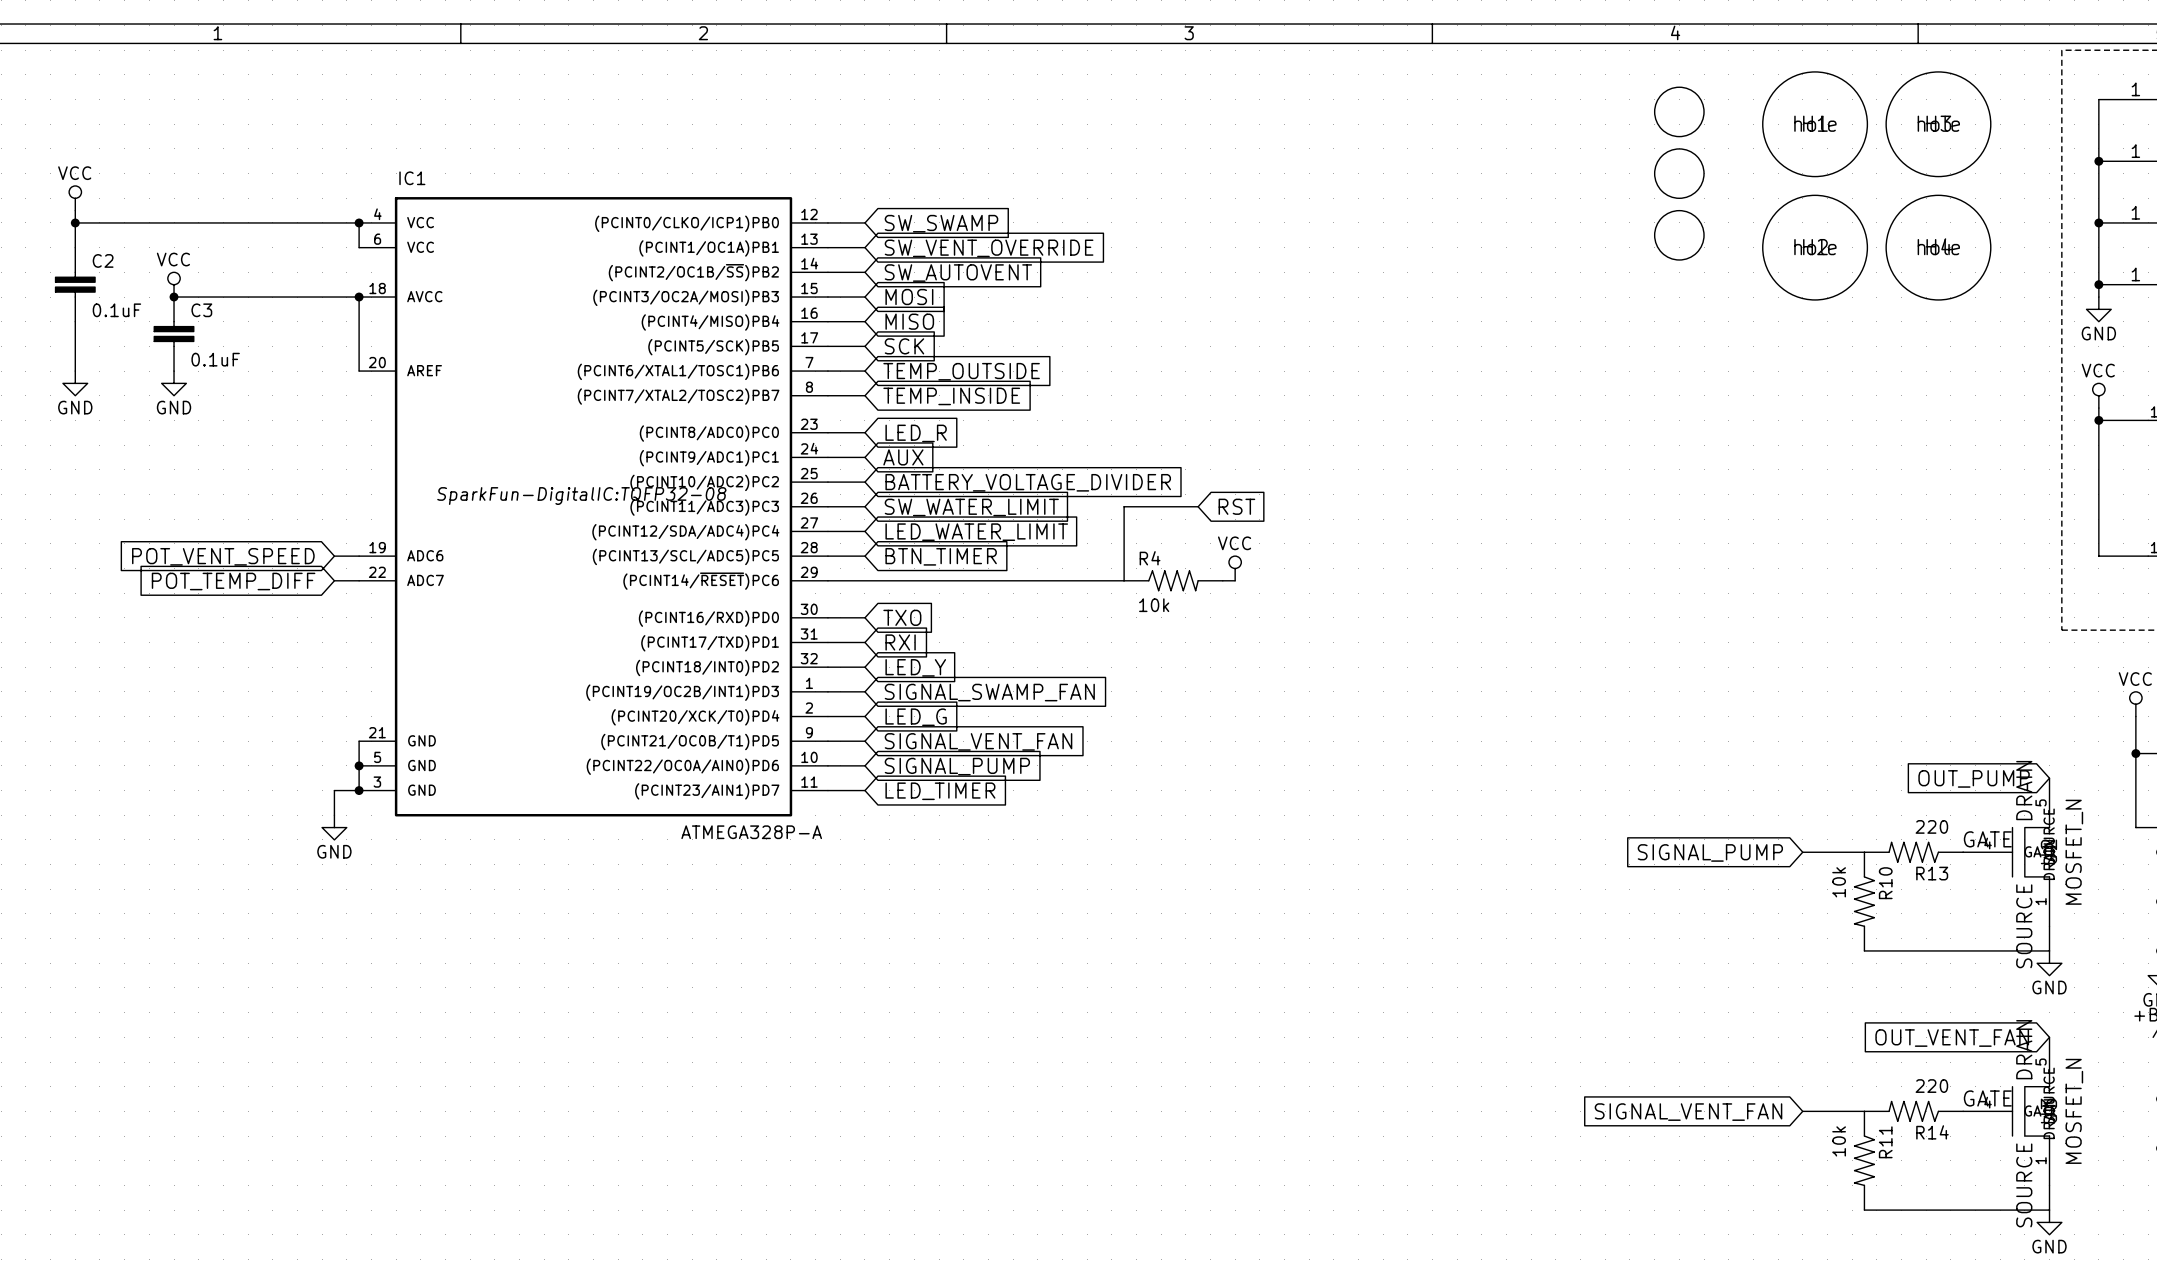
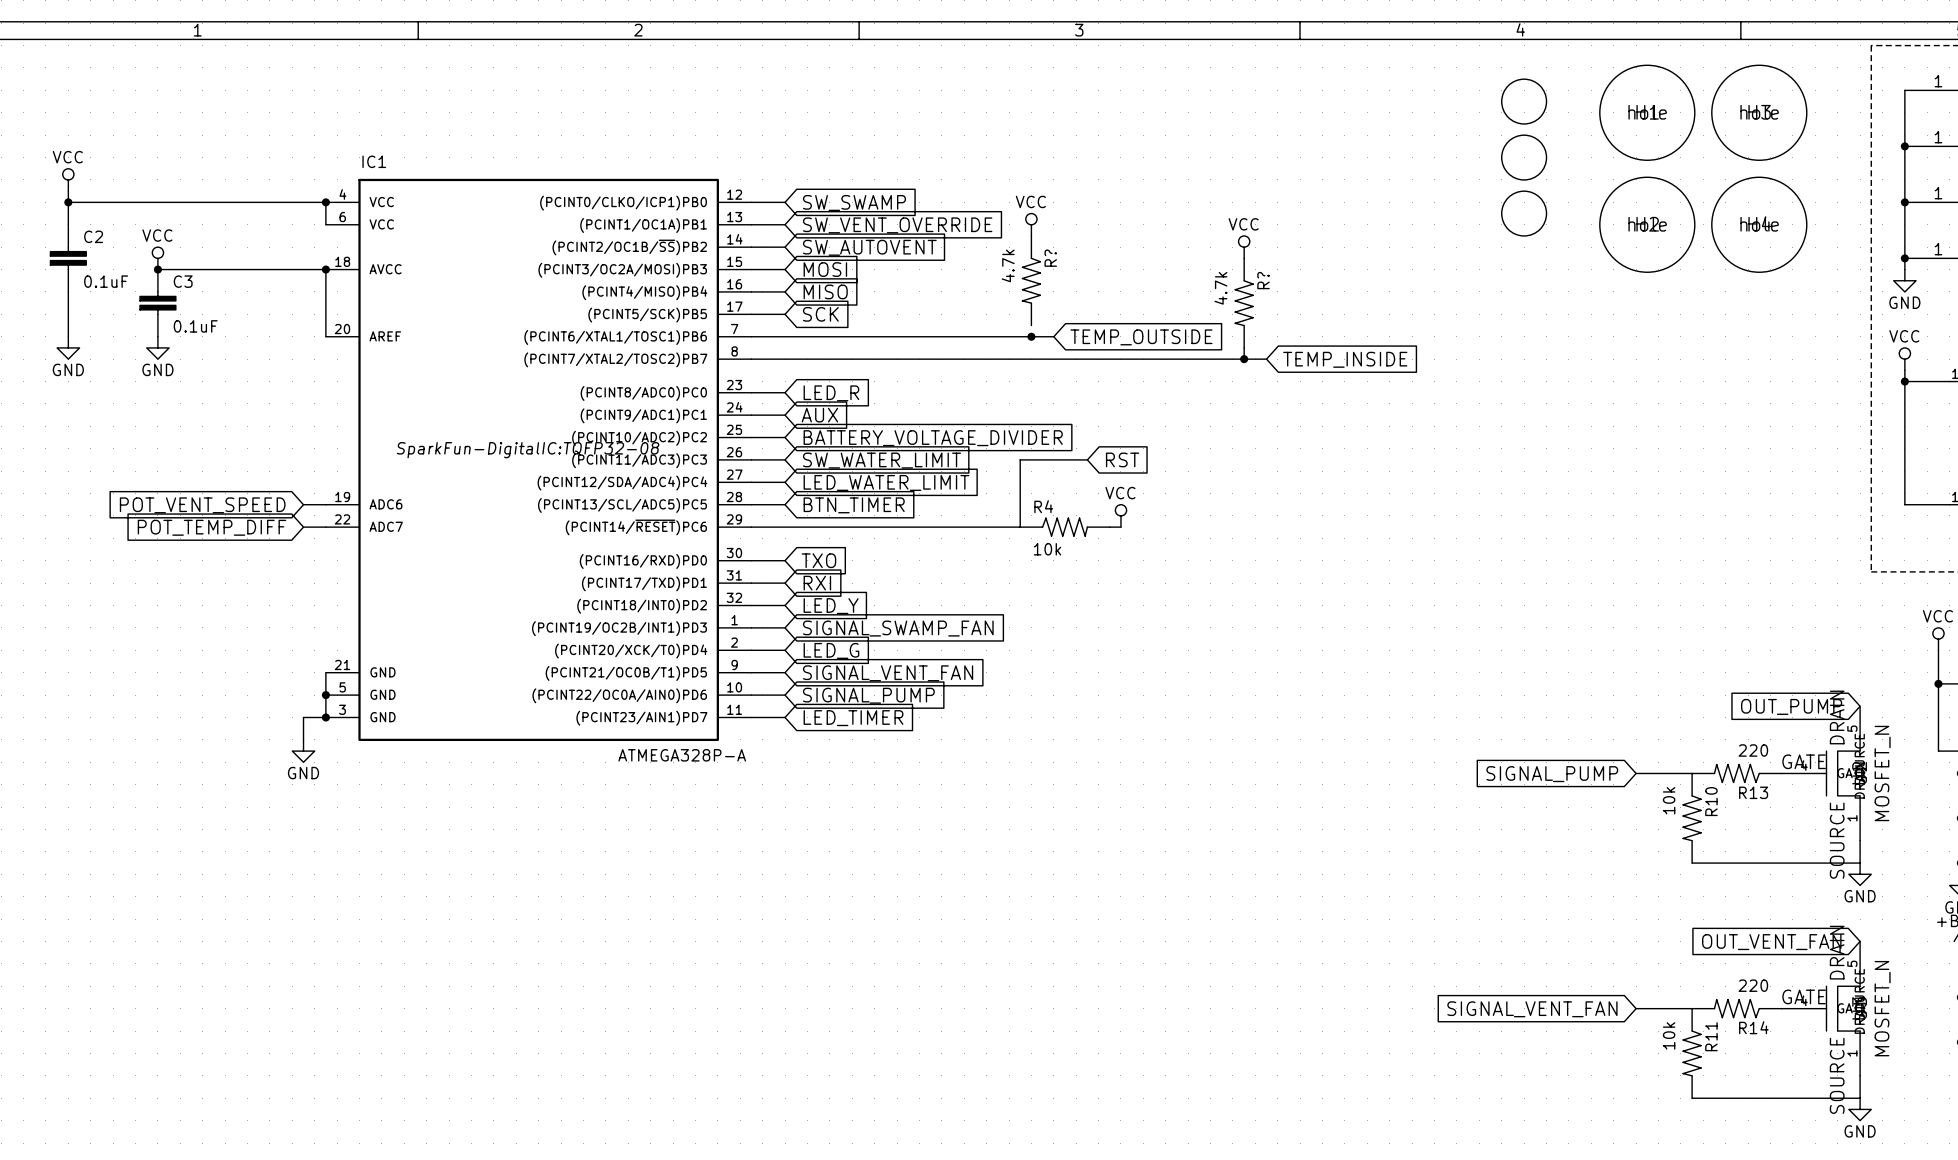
power symbol: none -> VCC (1031, 224)
power symbol: none -> VCC (1244, 247)
R?: none -> 4.7k (1031, 280)
R?: none -> 4.7k (1244, 303)
wire: none -> (785, 336) (1053, 336)
global label: TEMP_OUTSIDE (961, 371) -> none
junction: none -> (1031, 336)
global label: none -> TEMP_OUTSIDE (1141, 337)
wire: none -> (1244, 347) (1244, 359)
wire: none -> (785, 359) (1266, 359)
junction: none -> (1244, 359)
global label: TEMP_INSIDE (951, 396) -> none
global label: none -> TEMP_INSIDE (1345, 359)

